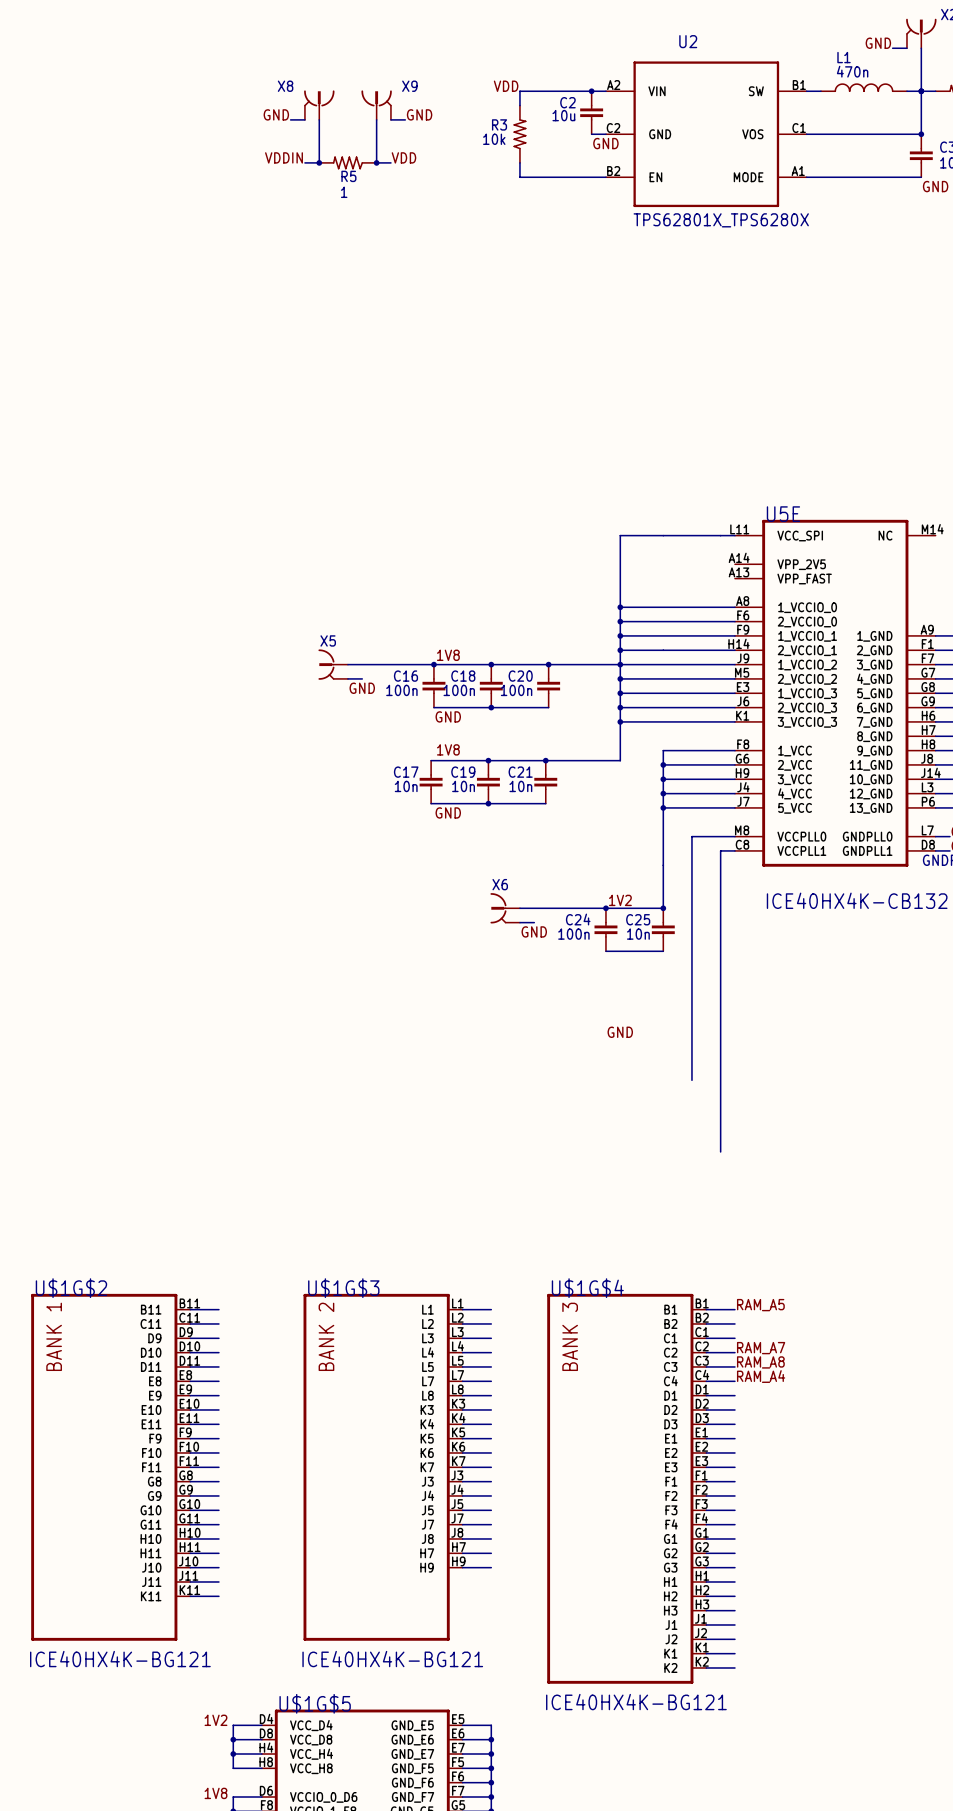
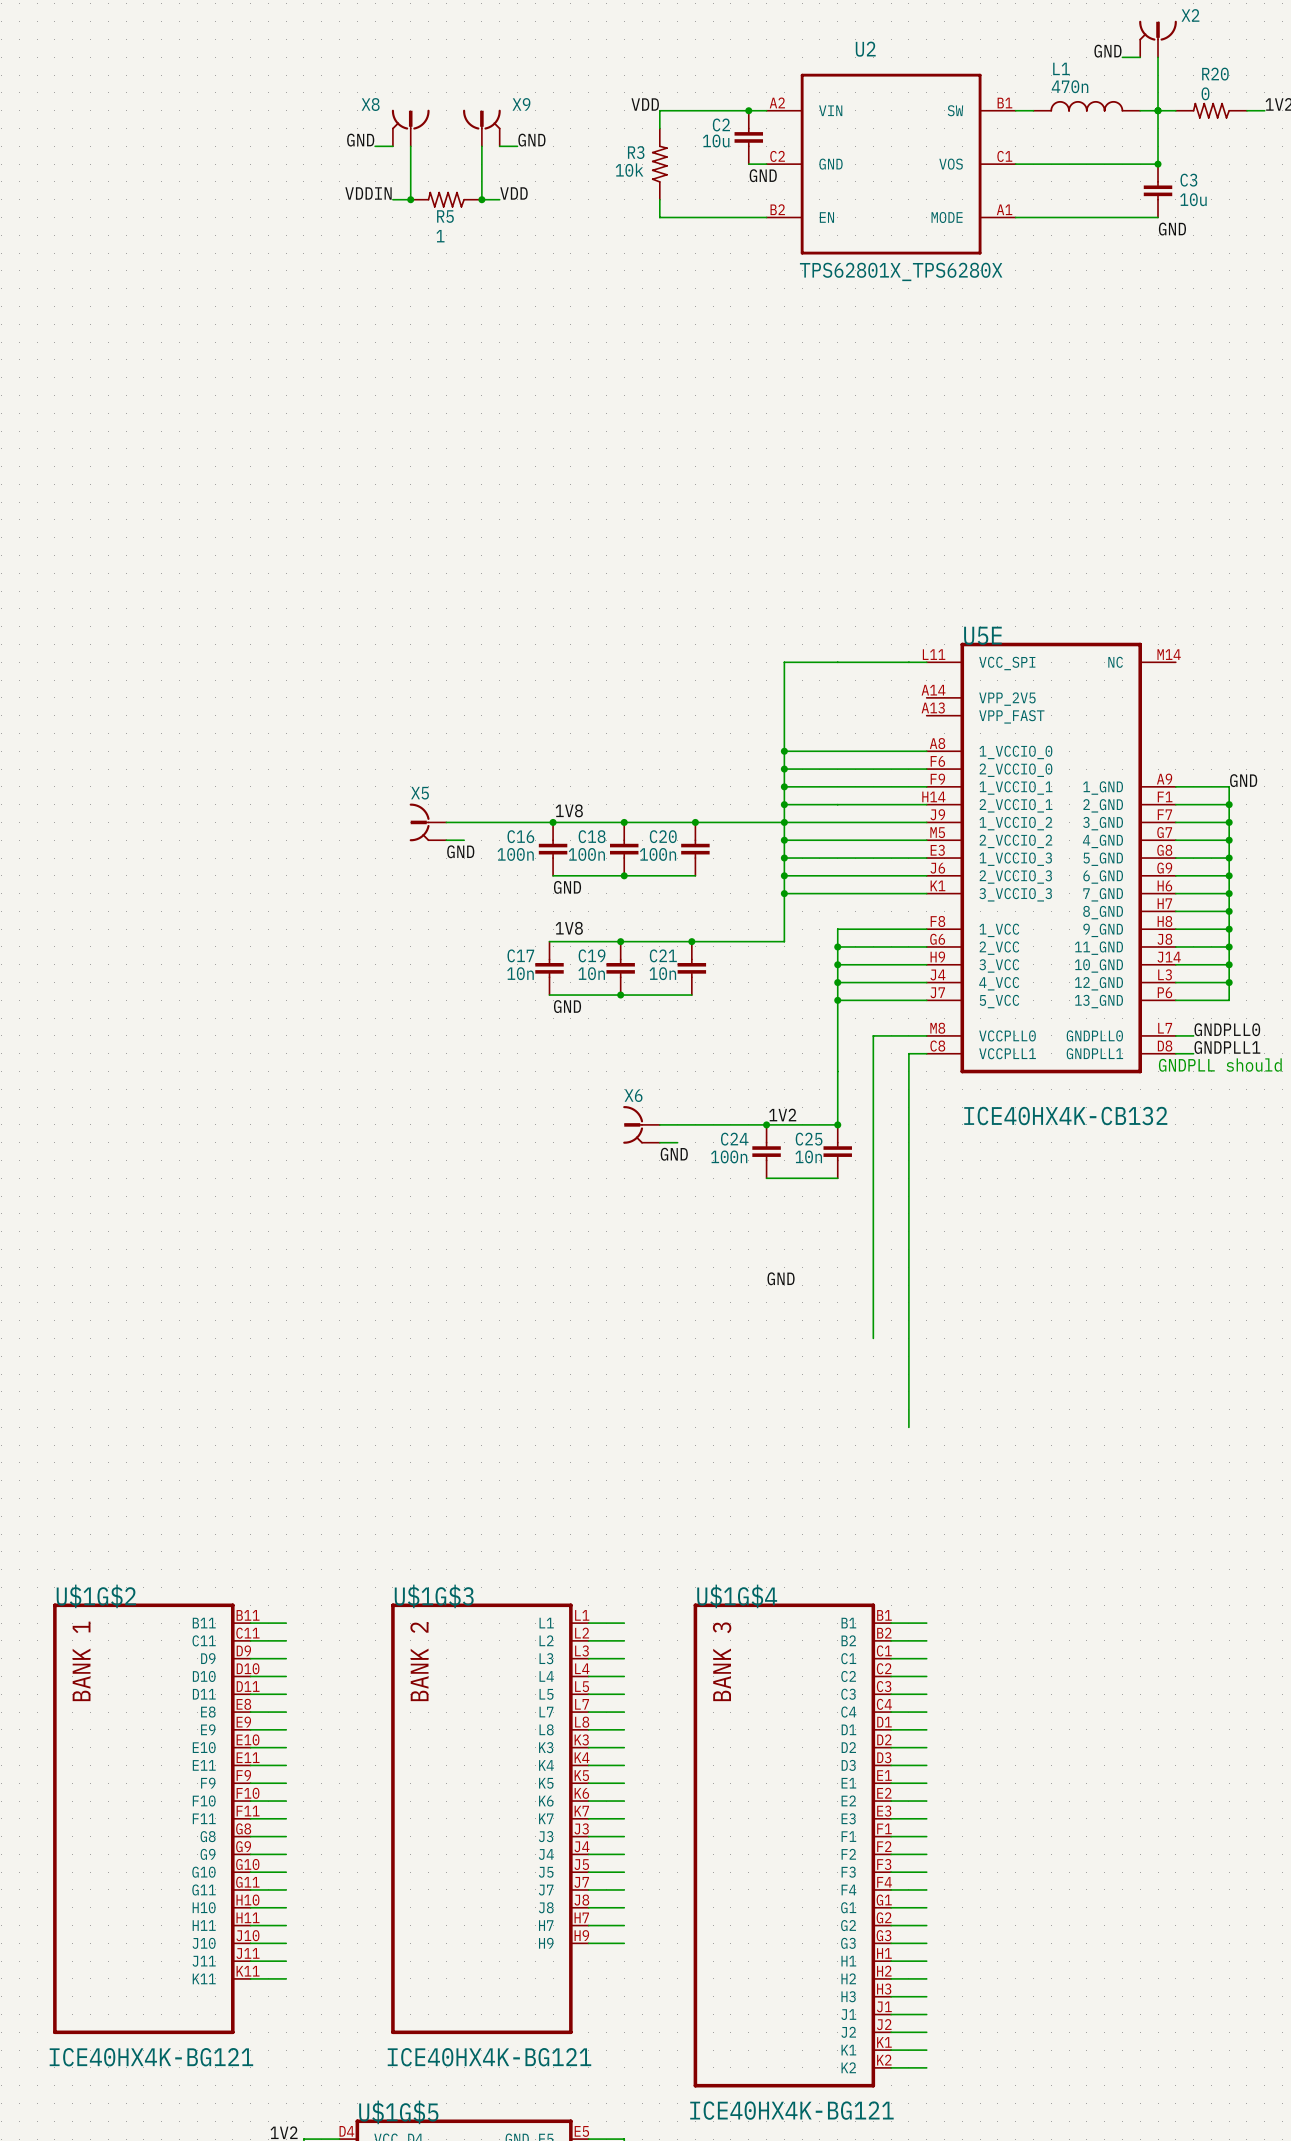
label: RAM_A5 (760, 1305) -> none
label: RAM_A7 (761, 1348) -> none
label: RAM_A8 (760, 1362) -> none
label: RAM_A4 (761, 1376) -> none

